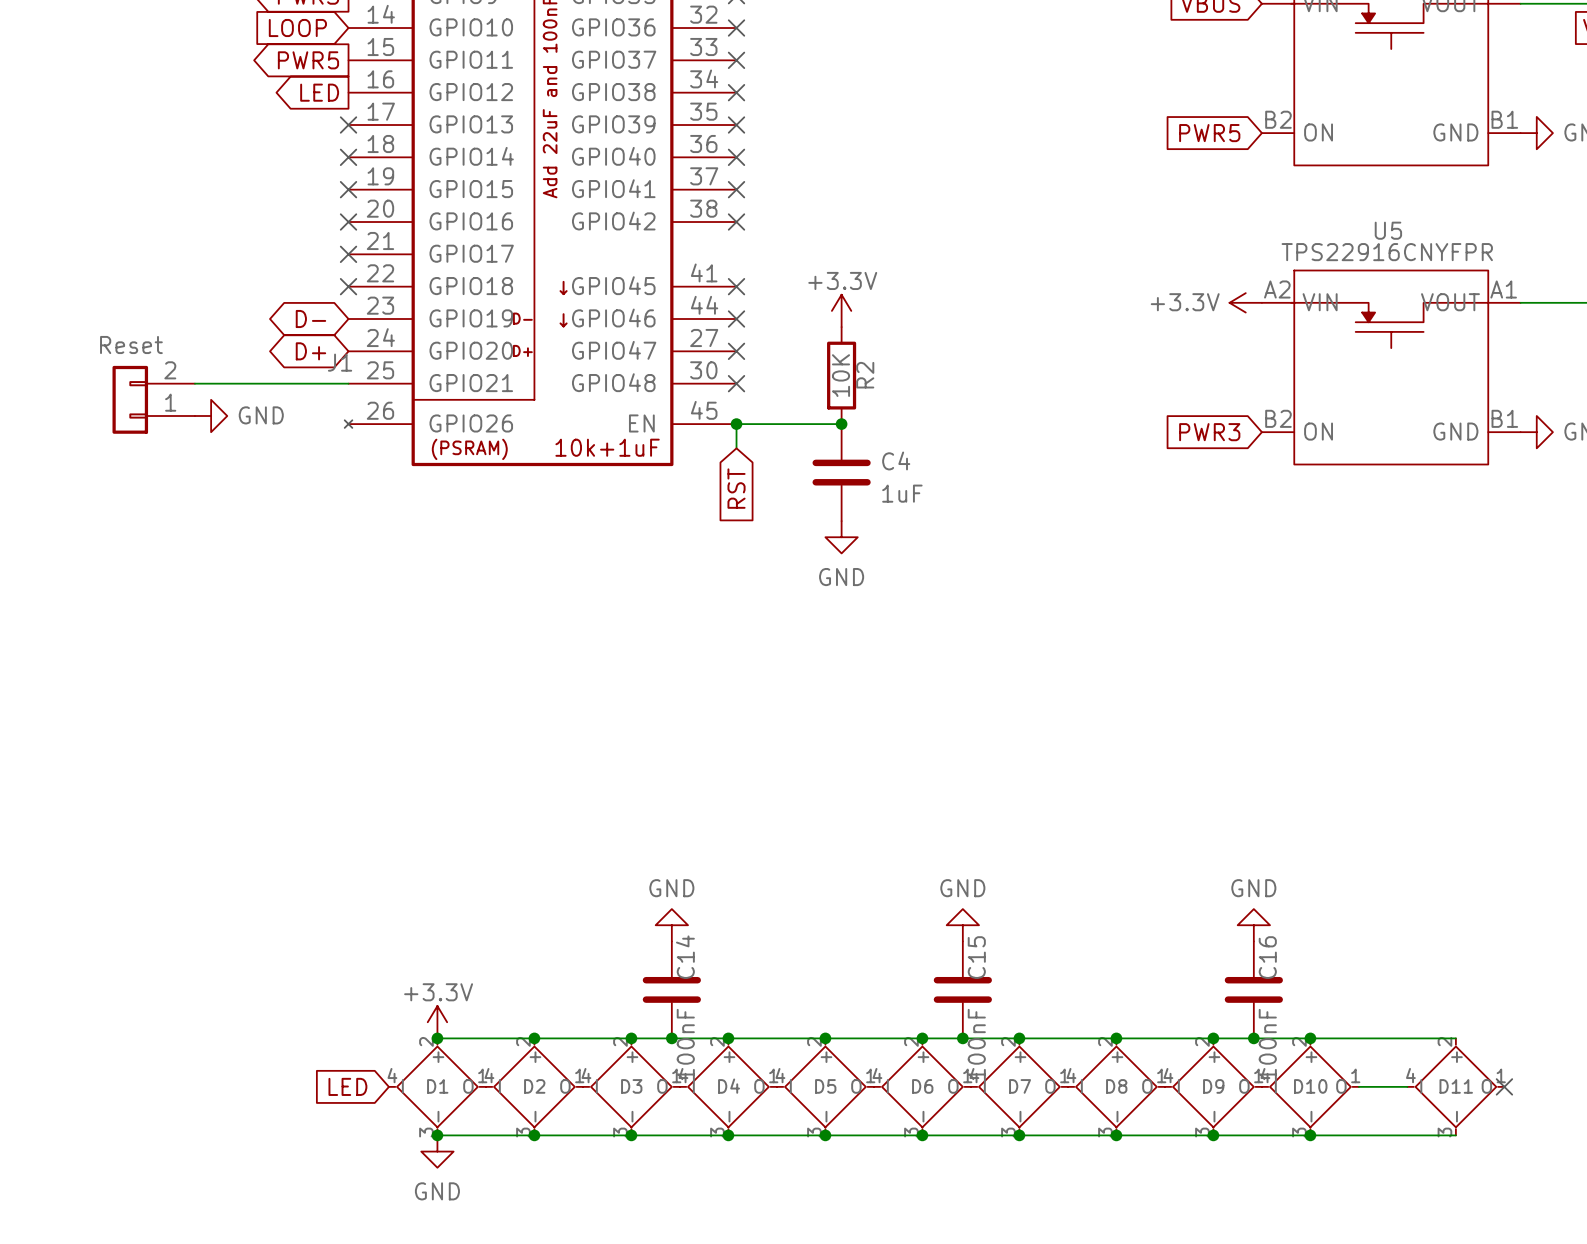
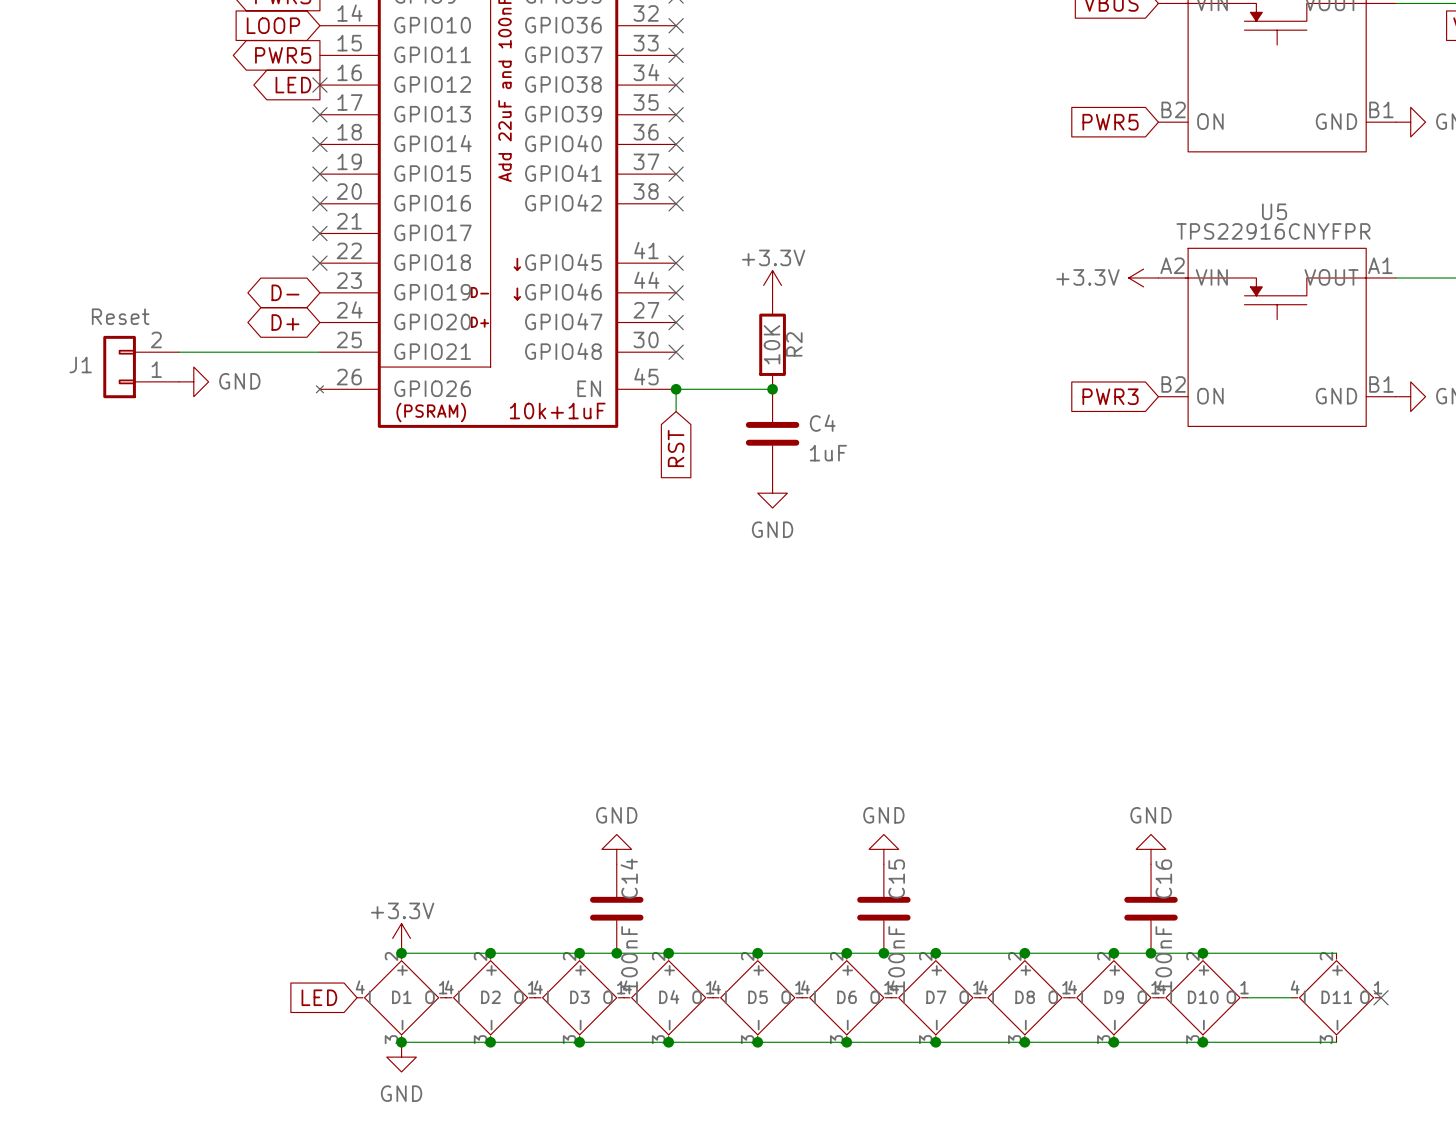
no-connect mark: none -> (319, 85)
J1 name position: J1 (340, 362) -> J1 (80, 365)

